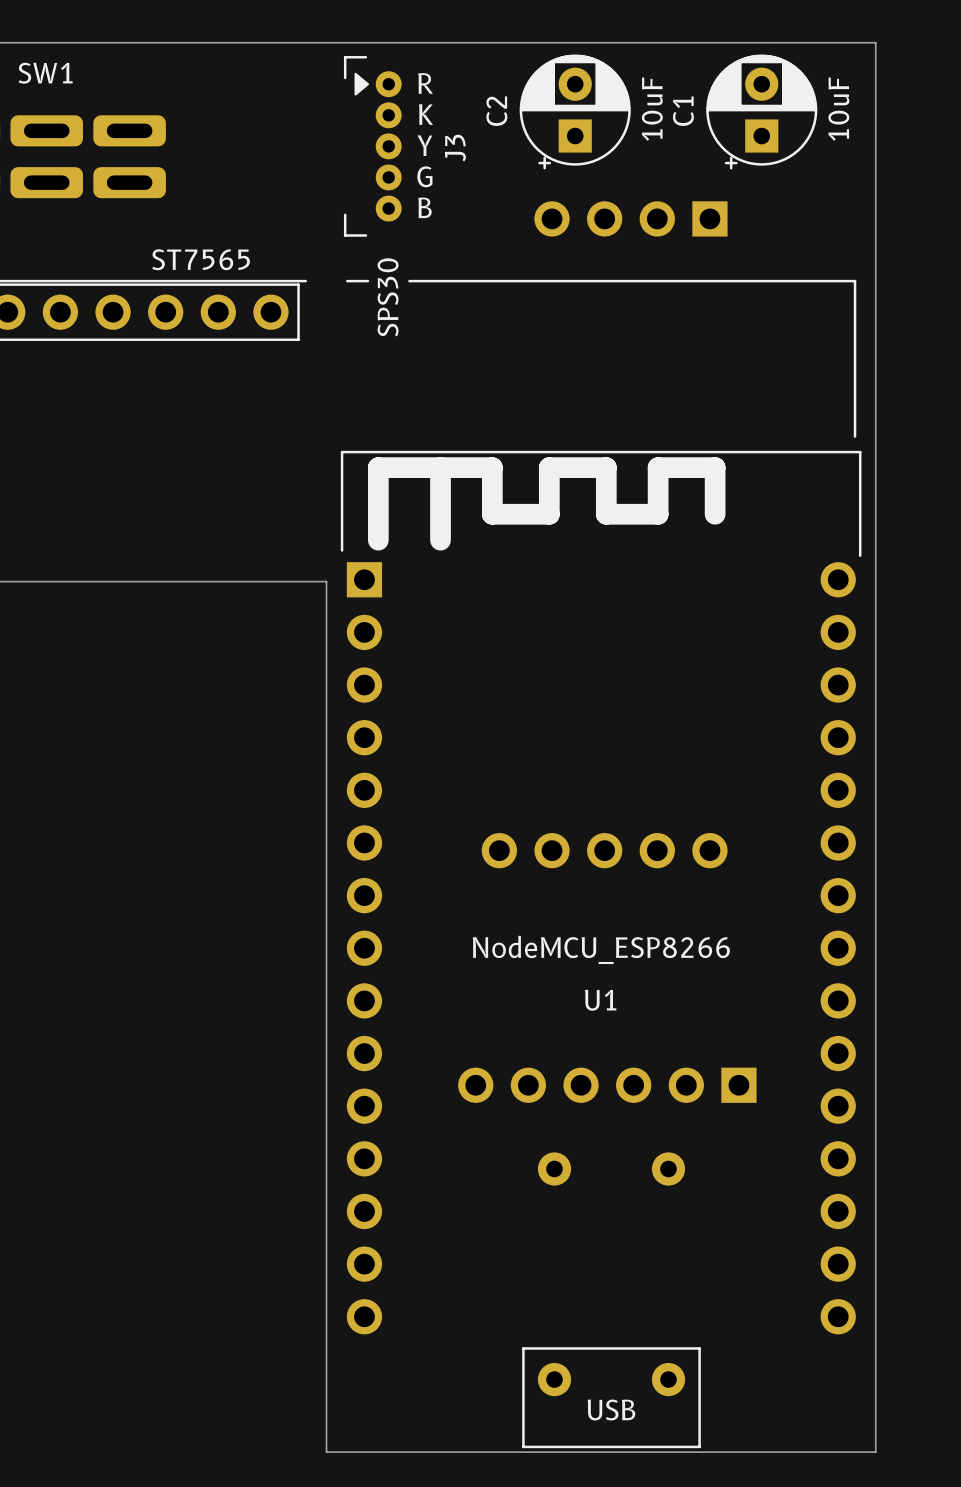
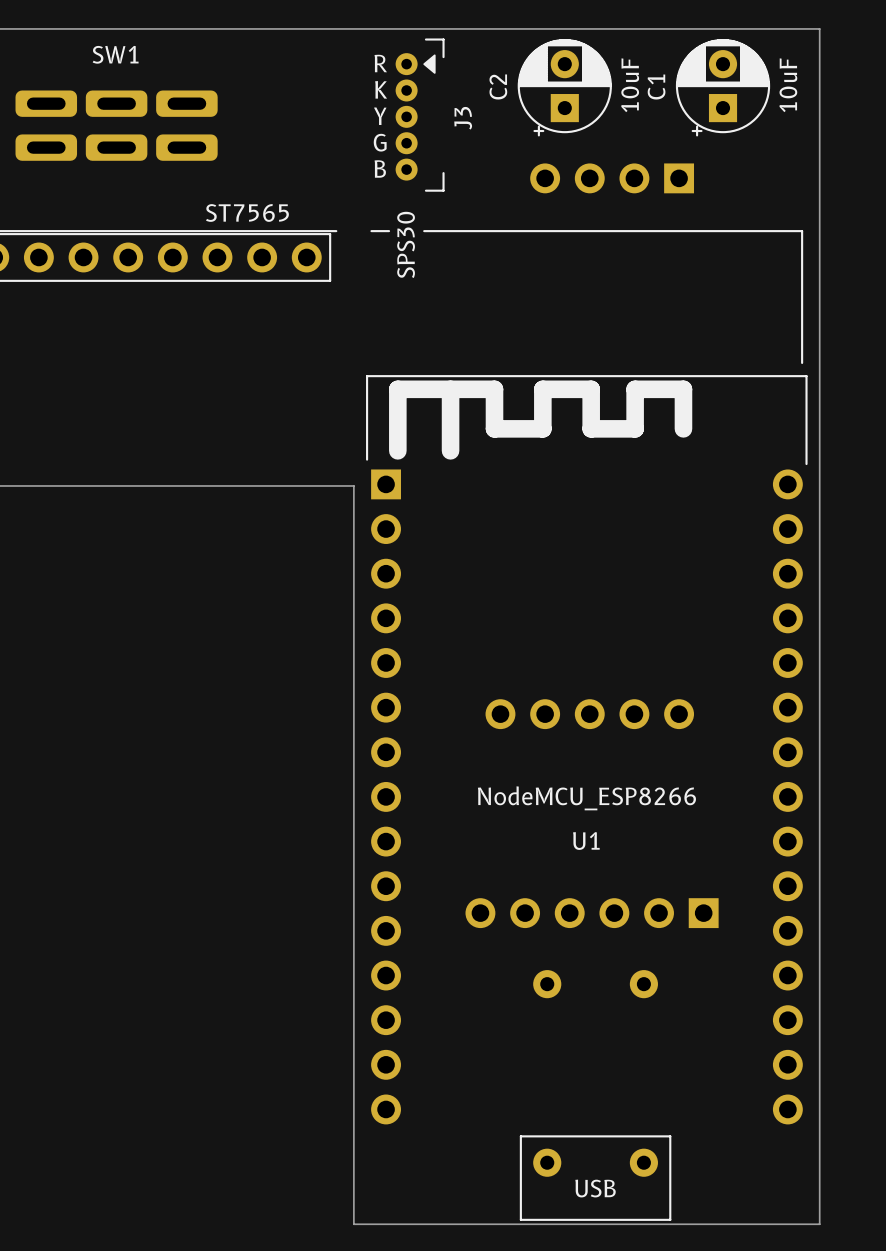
J3 footprint: [343, 56, 402, 237] -> [395, 38, 445, 192]
text position: R (425, 83) -> R (380, 63)
text position: K (425, 114) -> K (381, 89)
text position: Y (424, 145) -> Y (380, 116)
text position: G (424, 176) -> G (380, 142)
text position: B (424, 207) -> B (380, 168)

